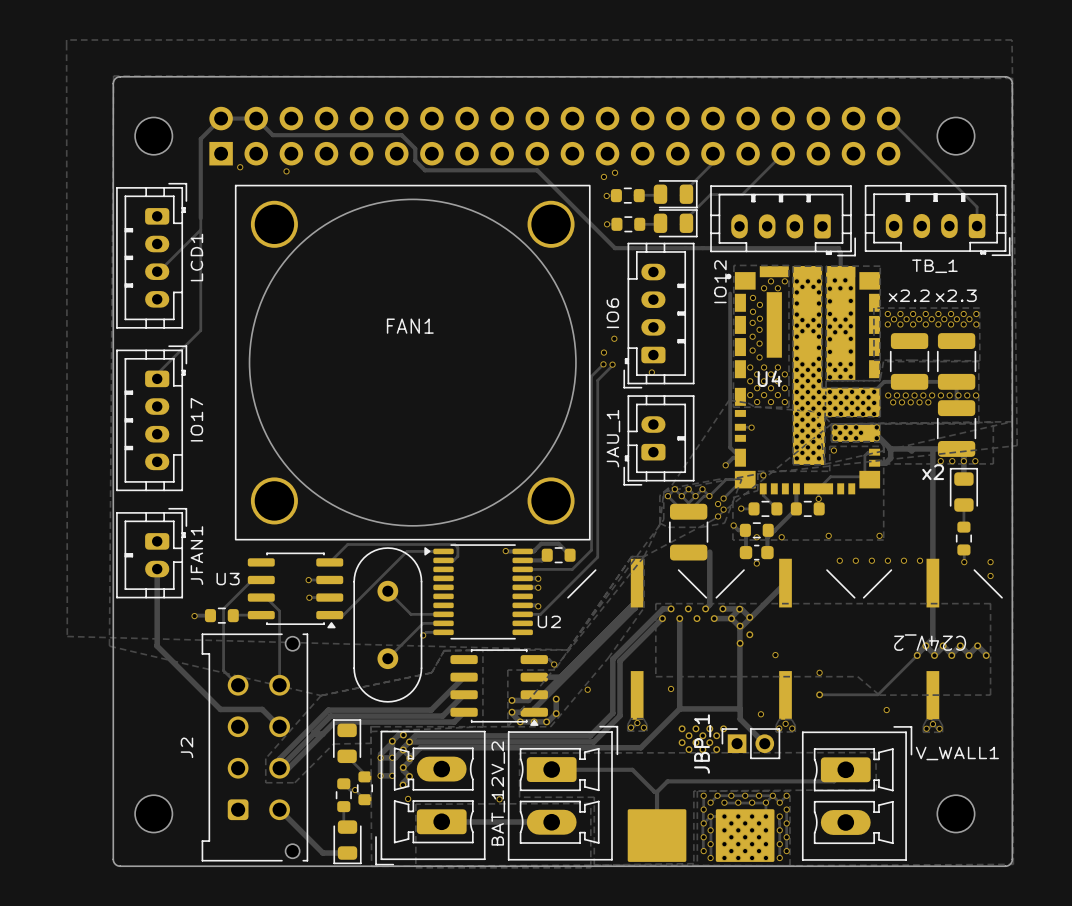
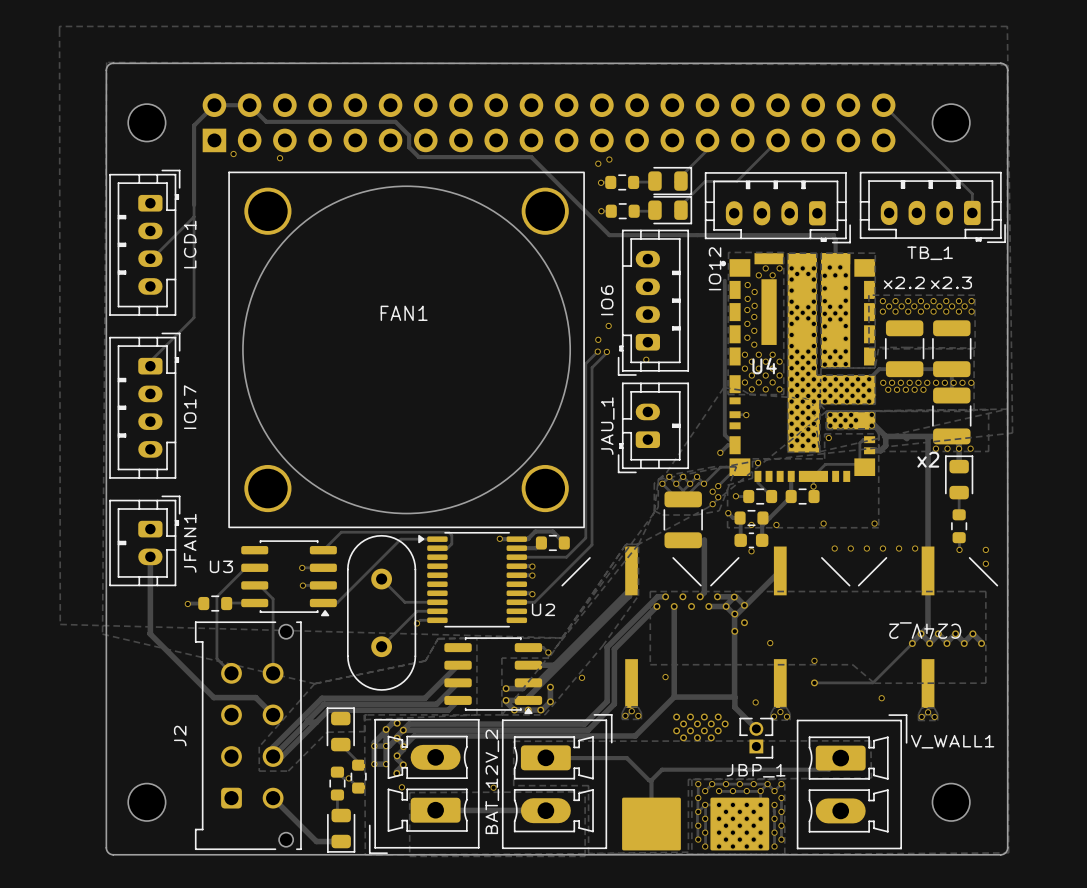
JBP_1 footprint: [721, 728, 781, 760] -> [739, 717, 774, 759]
via: none -> (725, 723)
via: none -> (718, 730)
JBP_1 name position: JBP_1 (702, 744) -> JBP_1 (756, 770)

